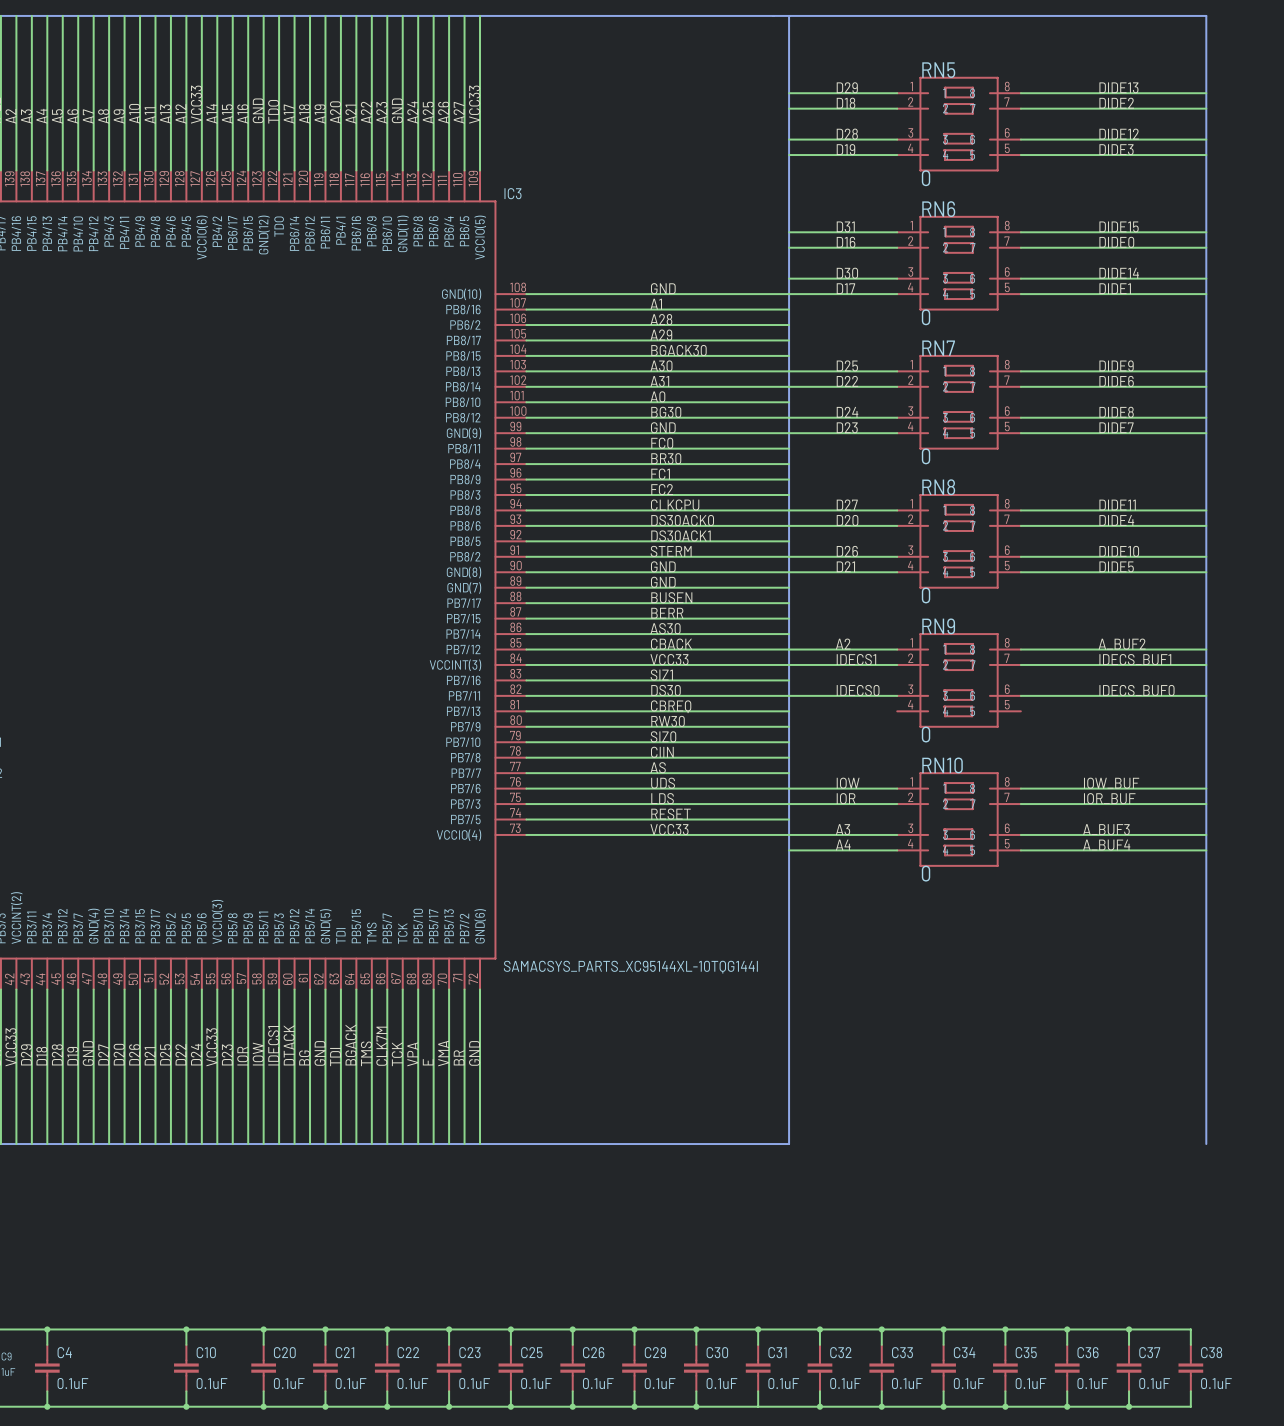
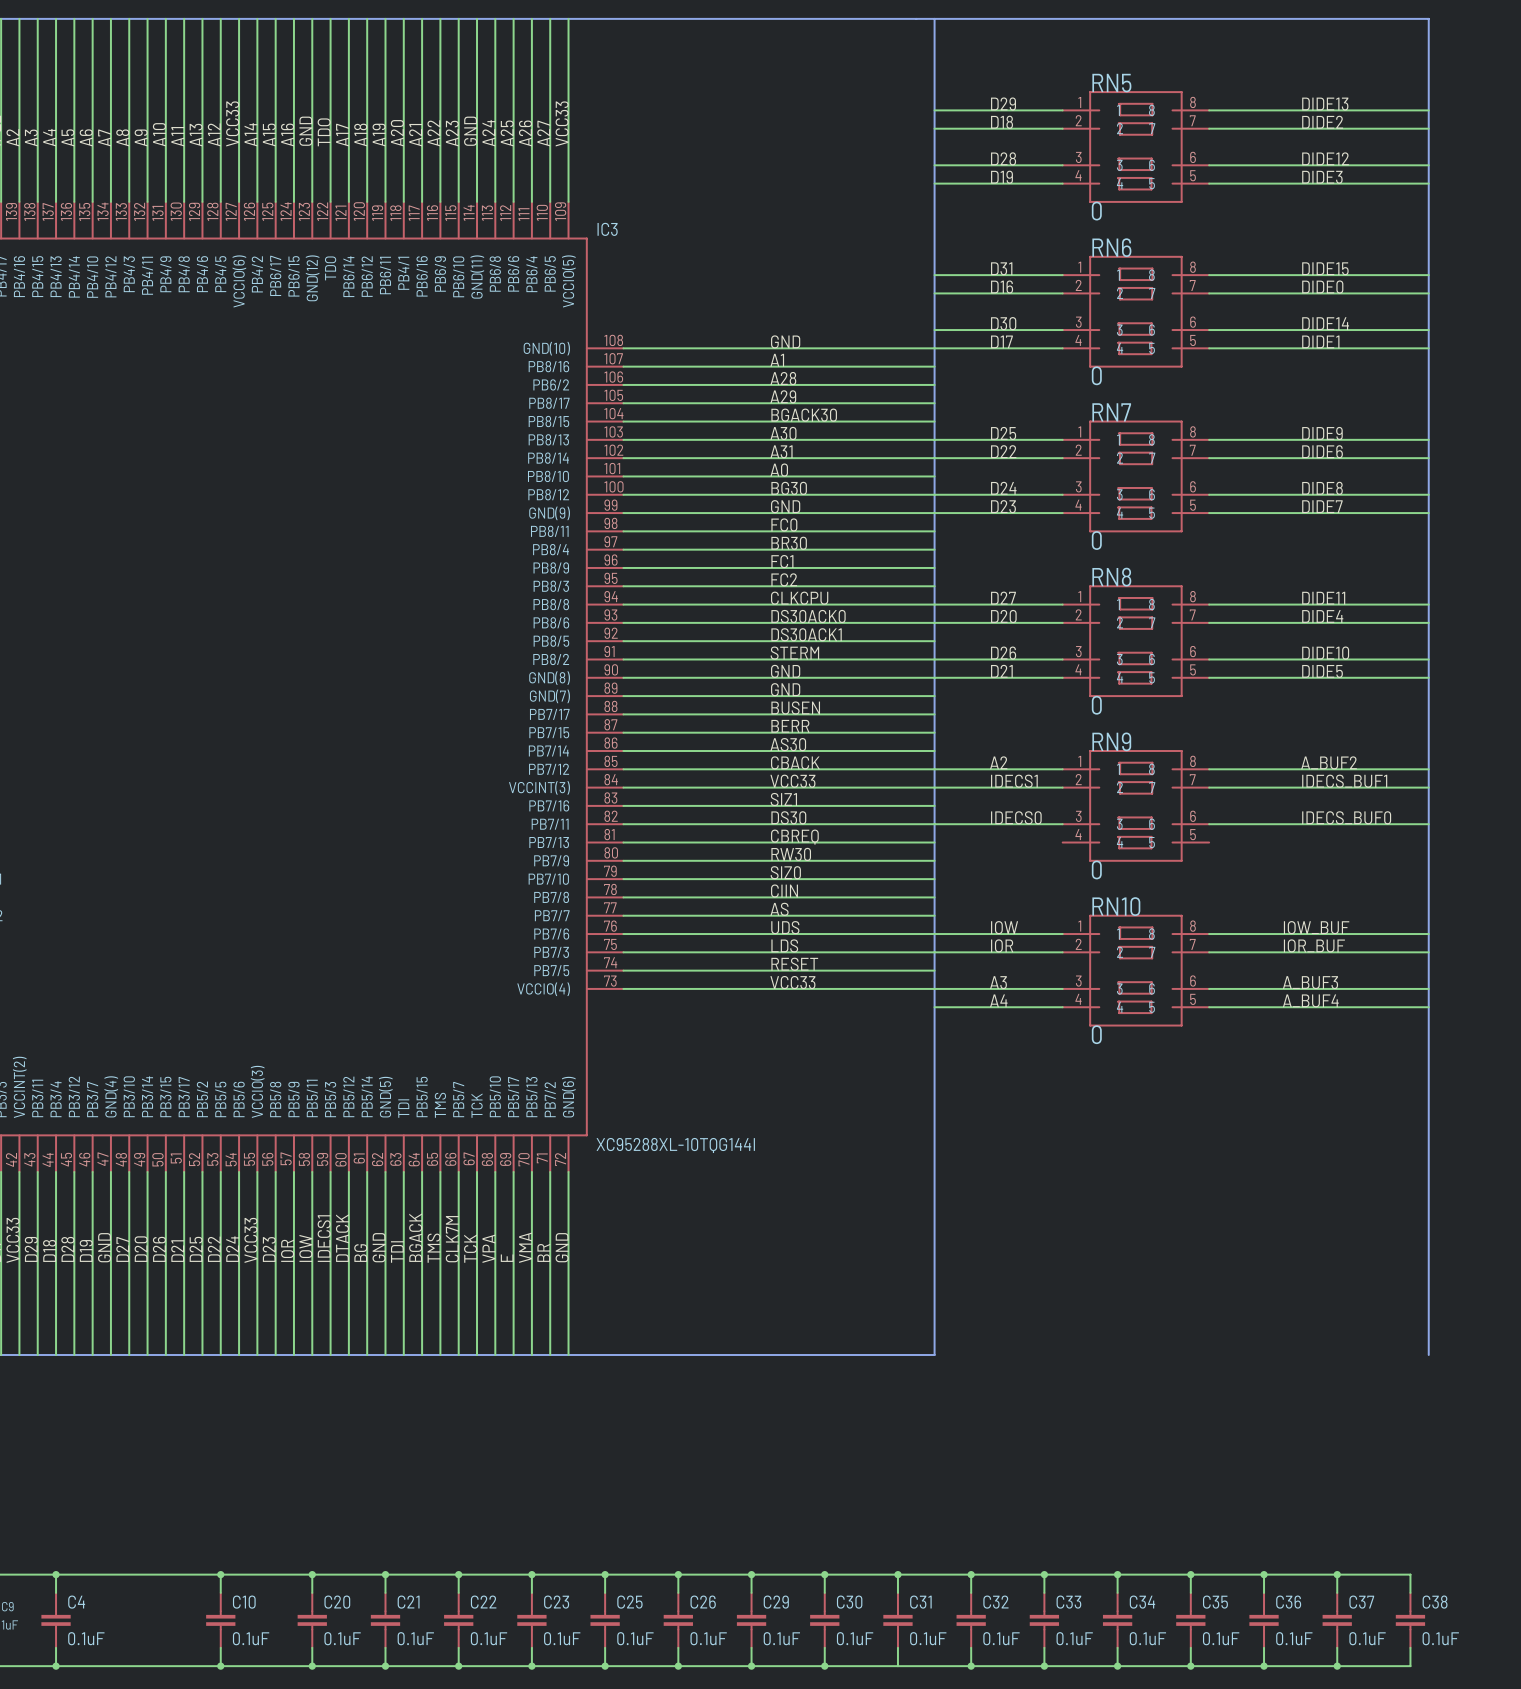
IC3 value: SAMACSYS_PARTS_XC95144XL-10TQG144I (630, 967) -> XC95288XL-10TQG144I (675, 1145)

